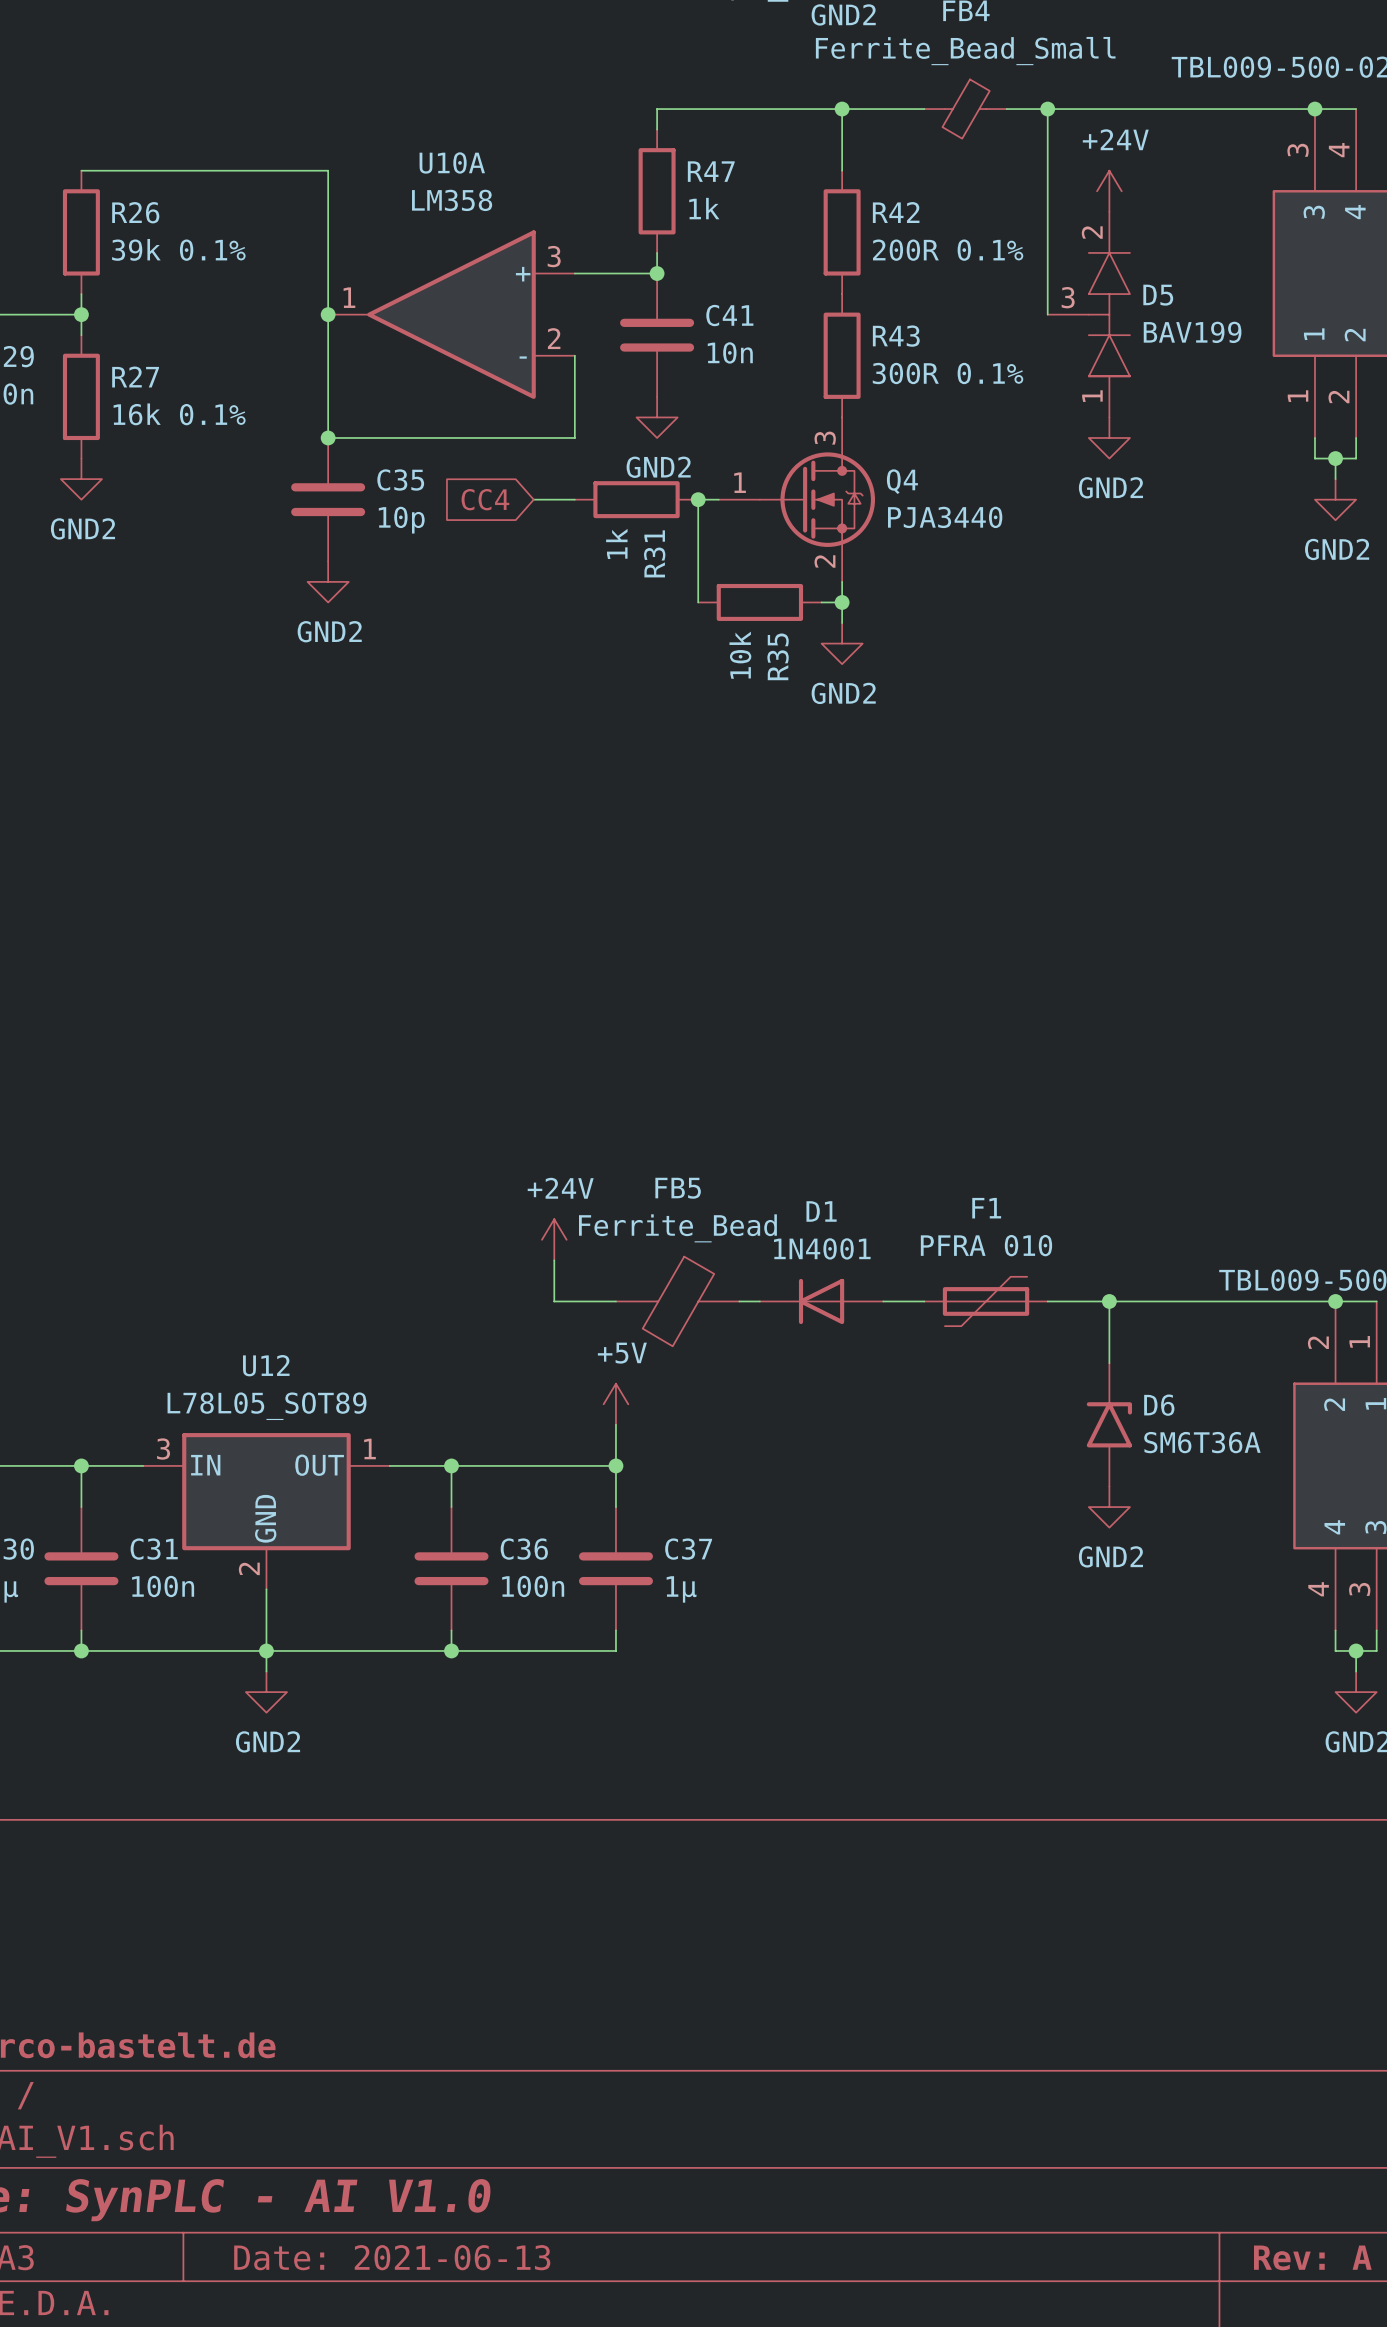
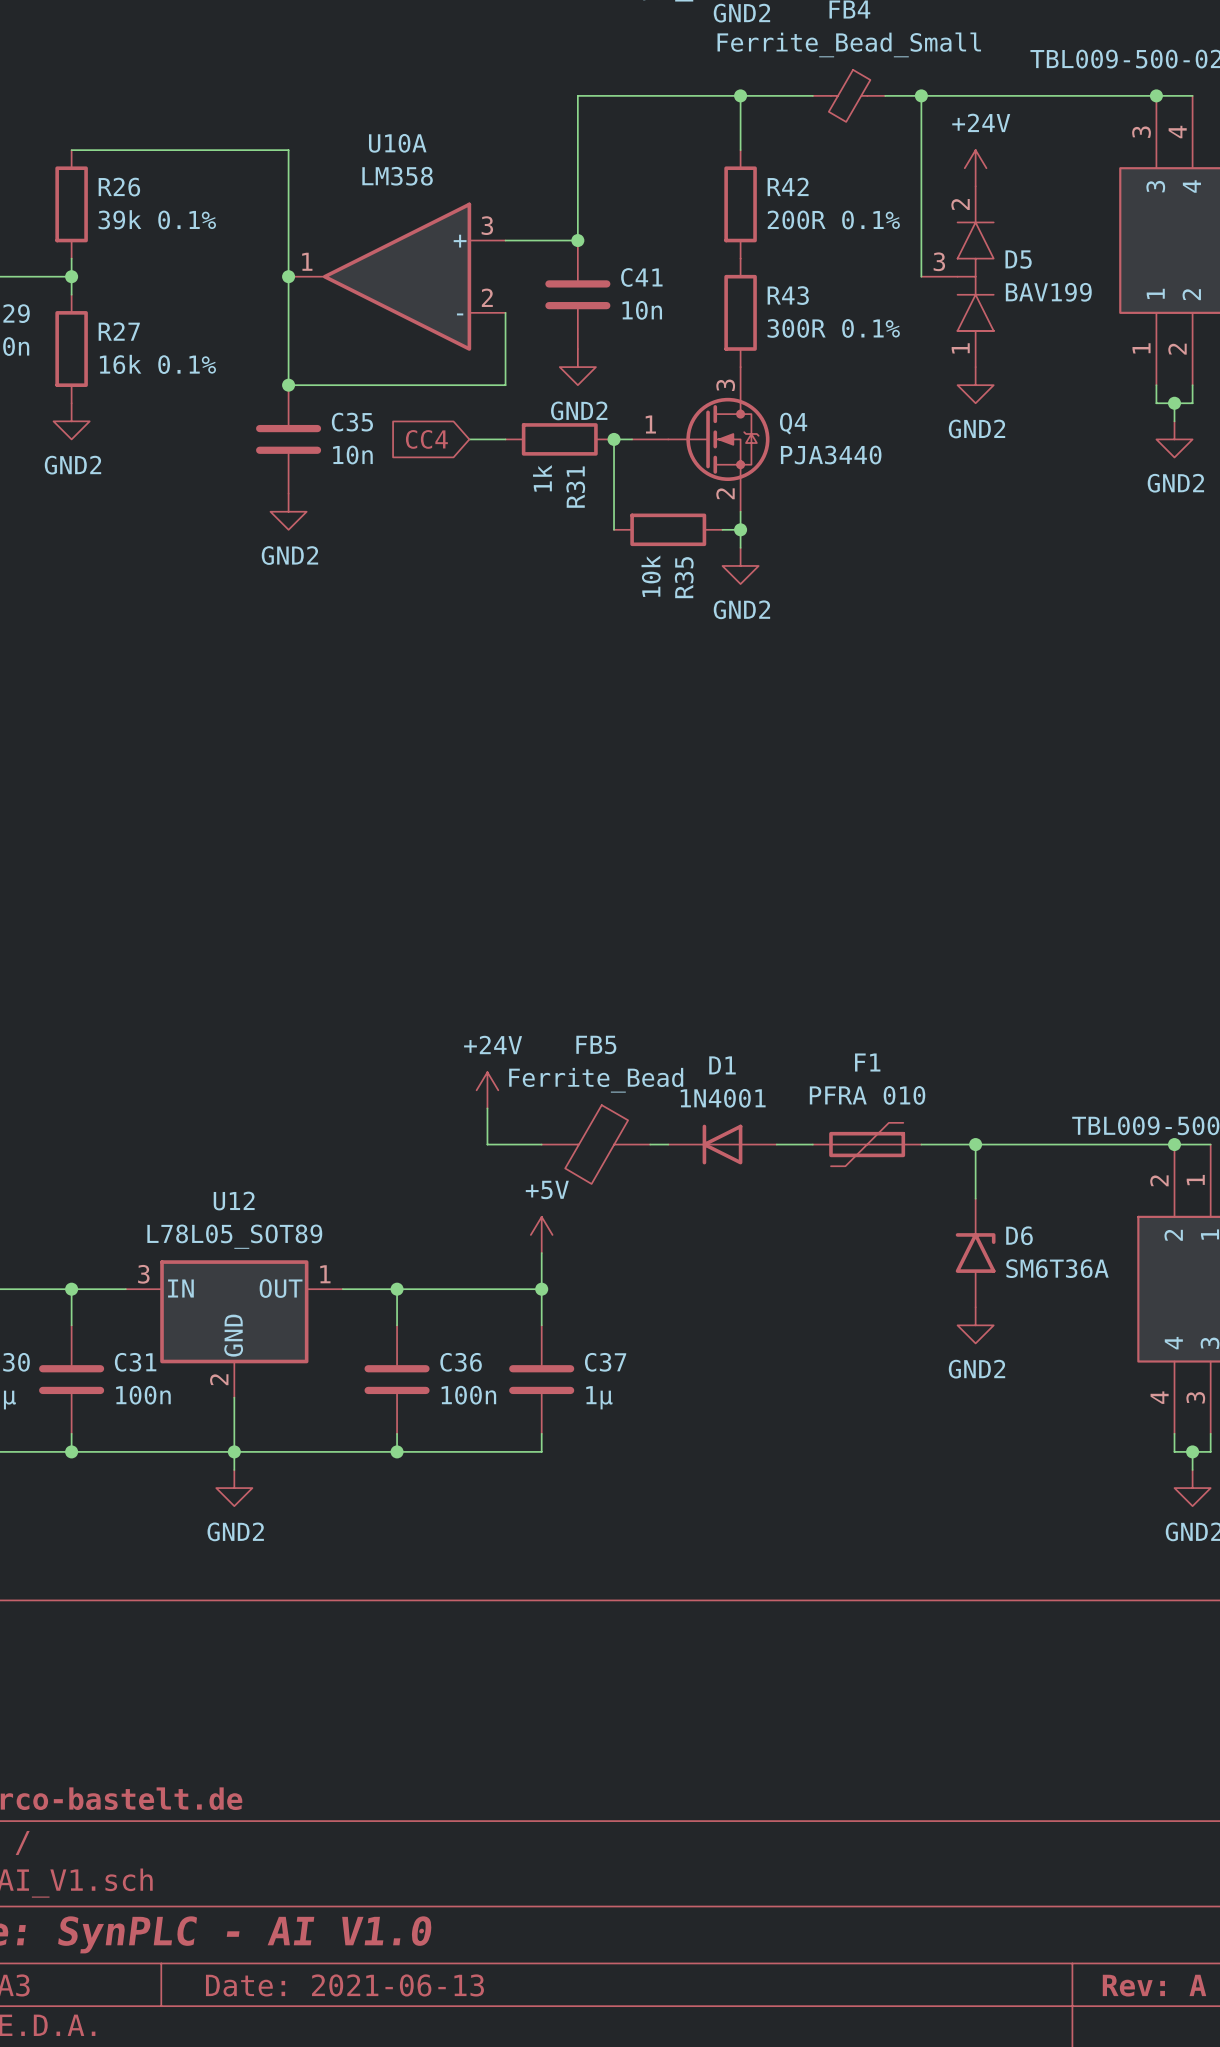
wire: none -> (577, 113) (577, 222)
R47: 1k (657, 191) -> none
C35 value: 10p (401, 520) -> 10n (352, 455)

